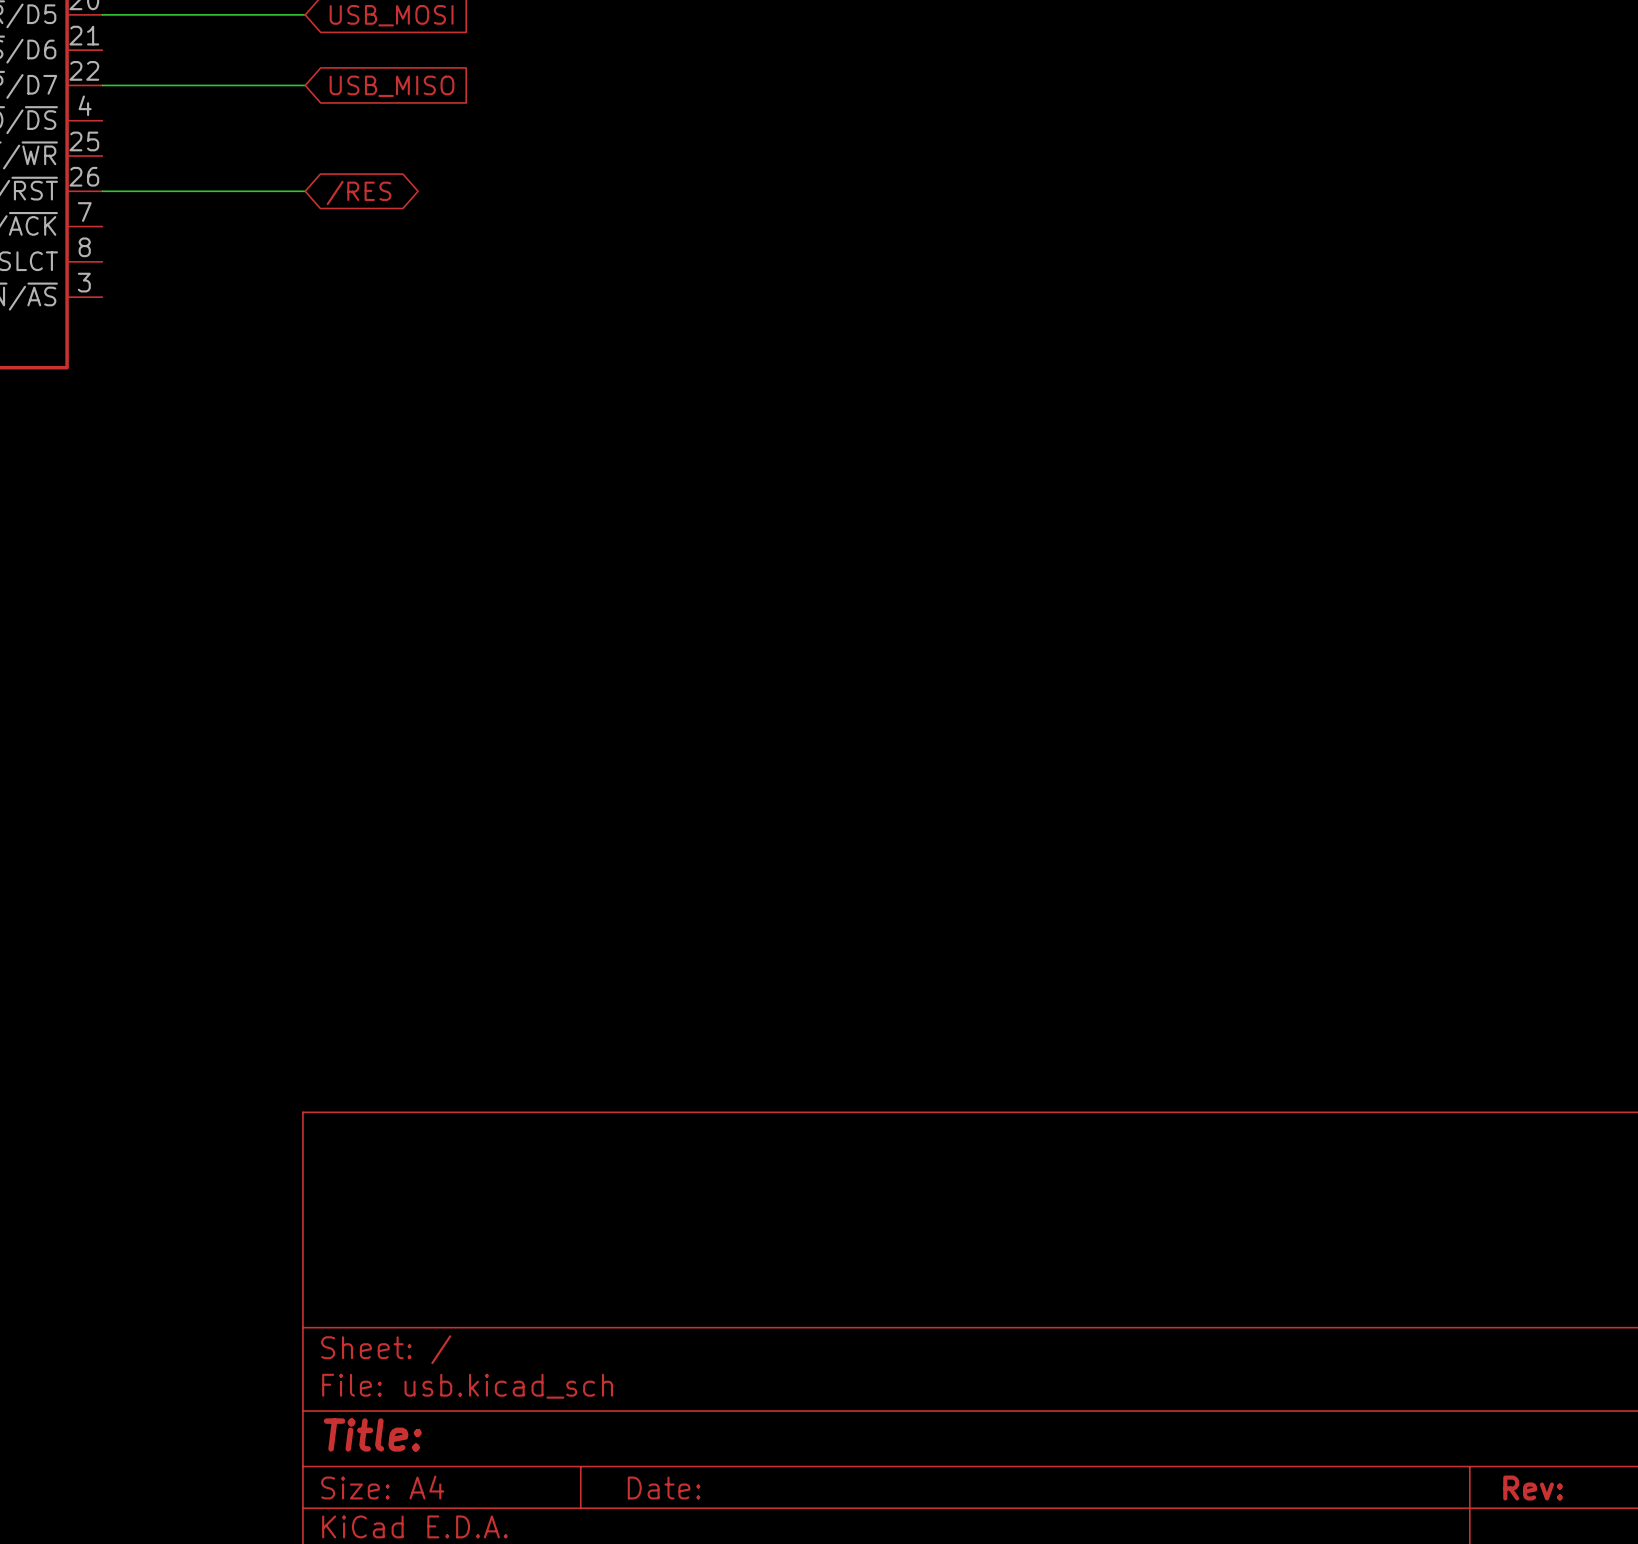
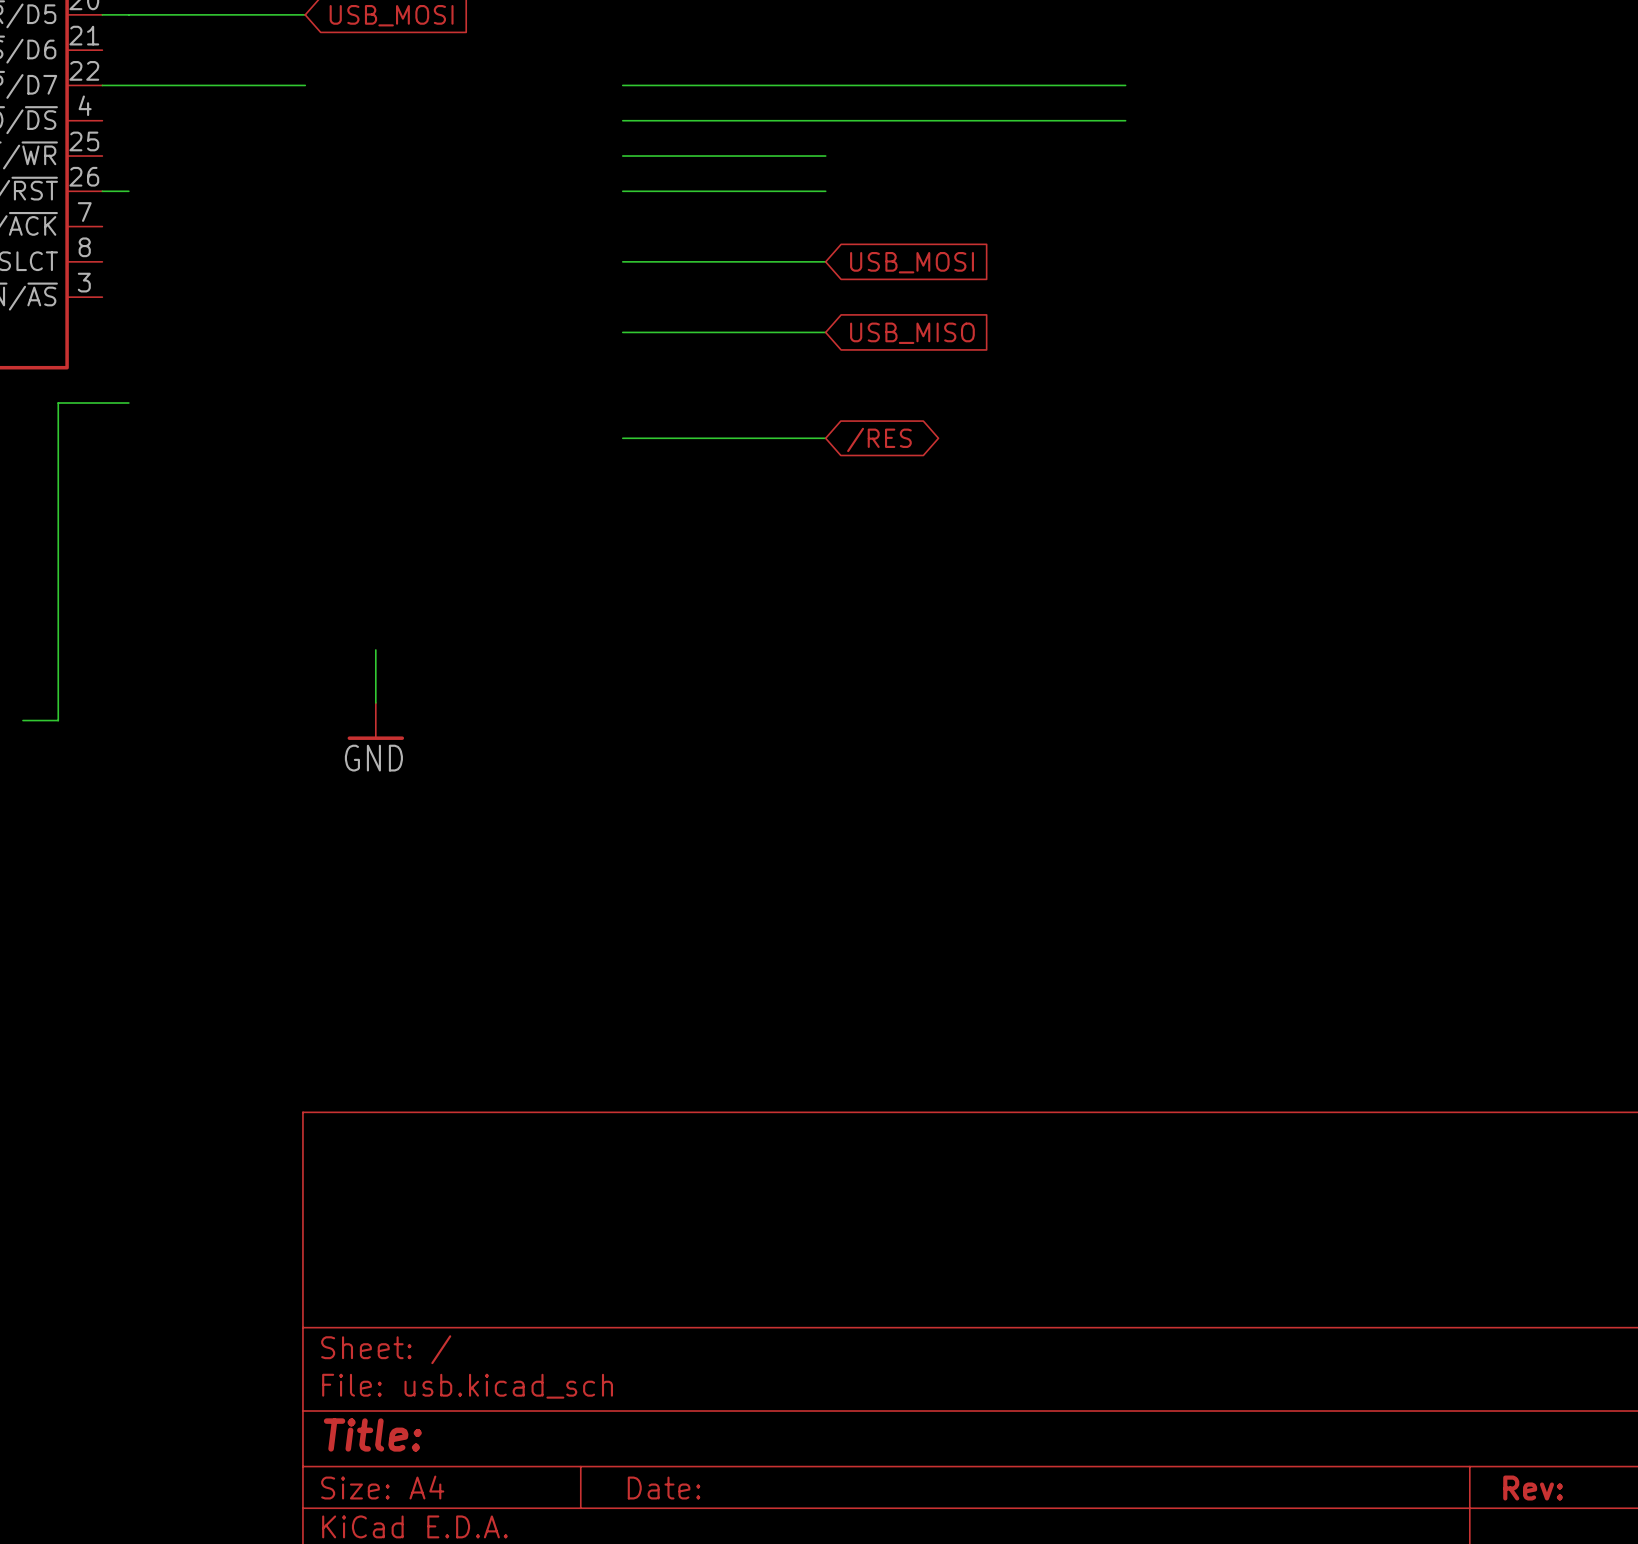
wire: none -> (622, 85) (1125, 85)
global label: USB_MISO (392, 86) -> none
wire: none -> (622, 120) (1125, 120)
wire: none -> (622, 156) (825, 156)
wire: (128, 191) (305, 191) -> none
wire: none -> (622, 191) (825, 191)
global label: /RES (359, 192) -> none
wire: none -> (622, 261) (825, 261)
global label: none -> USB_MOSI (912, 262)
wire: none -> (622, 332) (825, 332)
global label: none -> USB_MISO (912, 333)
wire: none -> (128, 402) (58, 402) (58, 720) (22, 720)
wire: none -> (622, 438) (825, 438)
global label: none -> /RES (879, 439)
wire: none -> (375, 649) (375, 702)
power symbol: none -> GND (375, 721)

